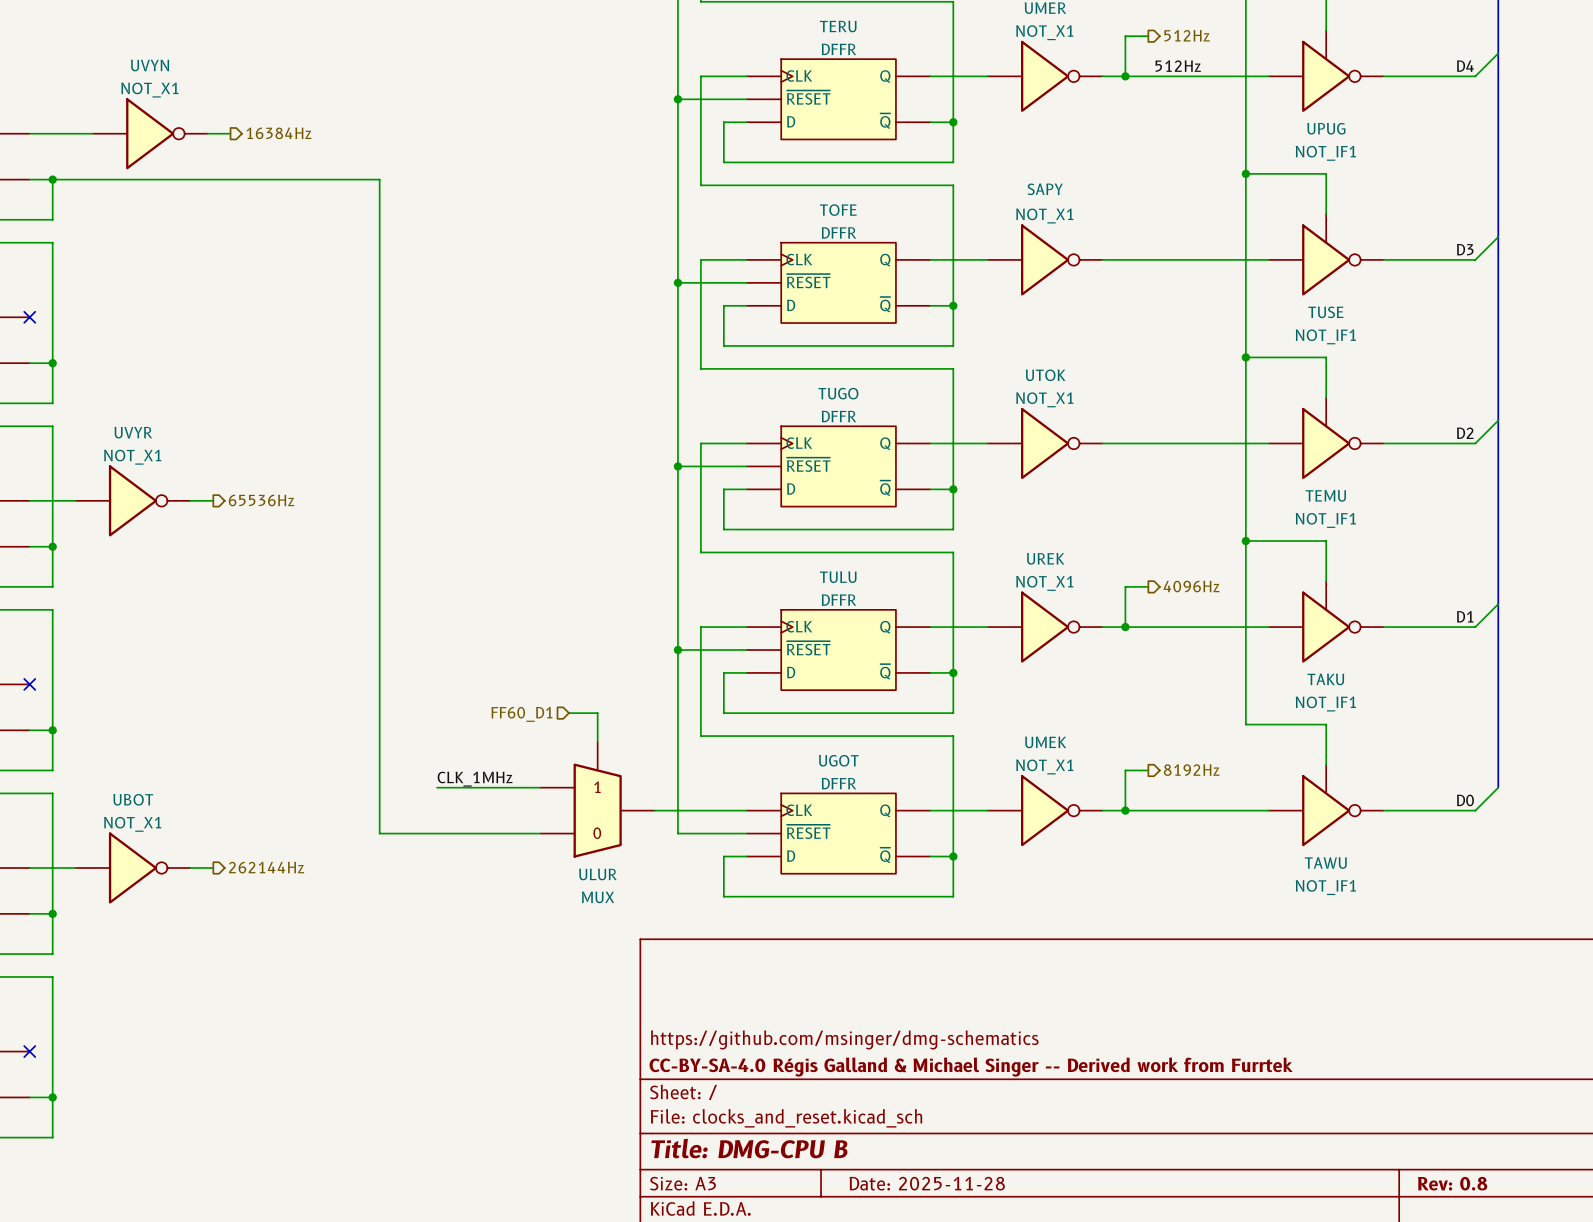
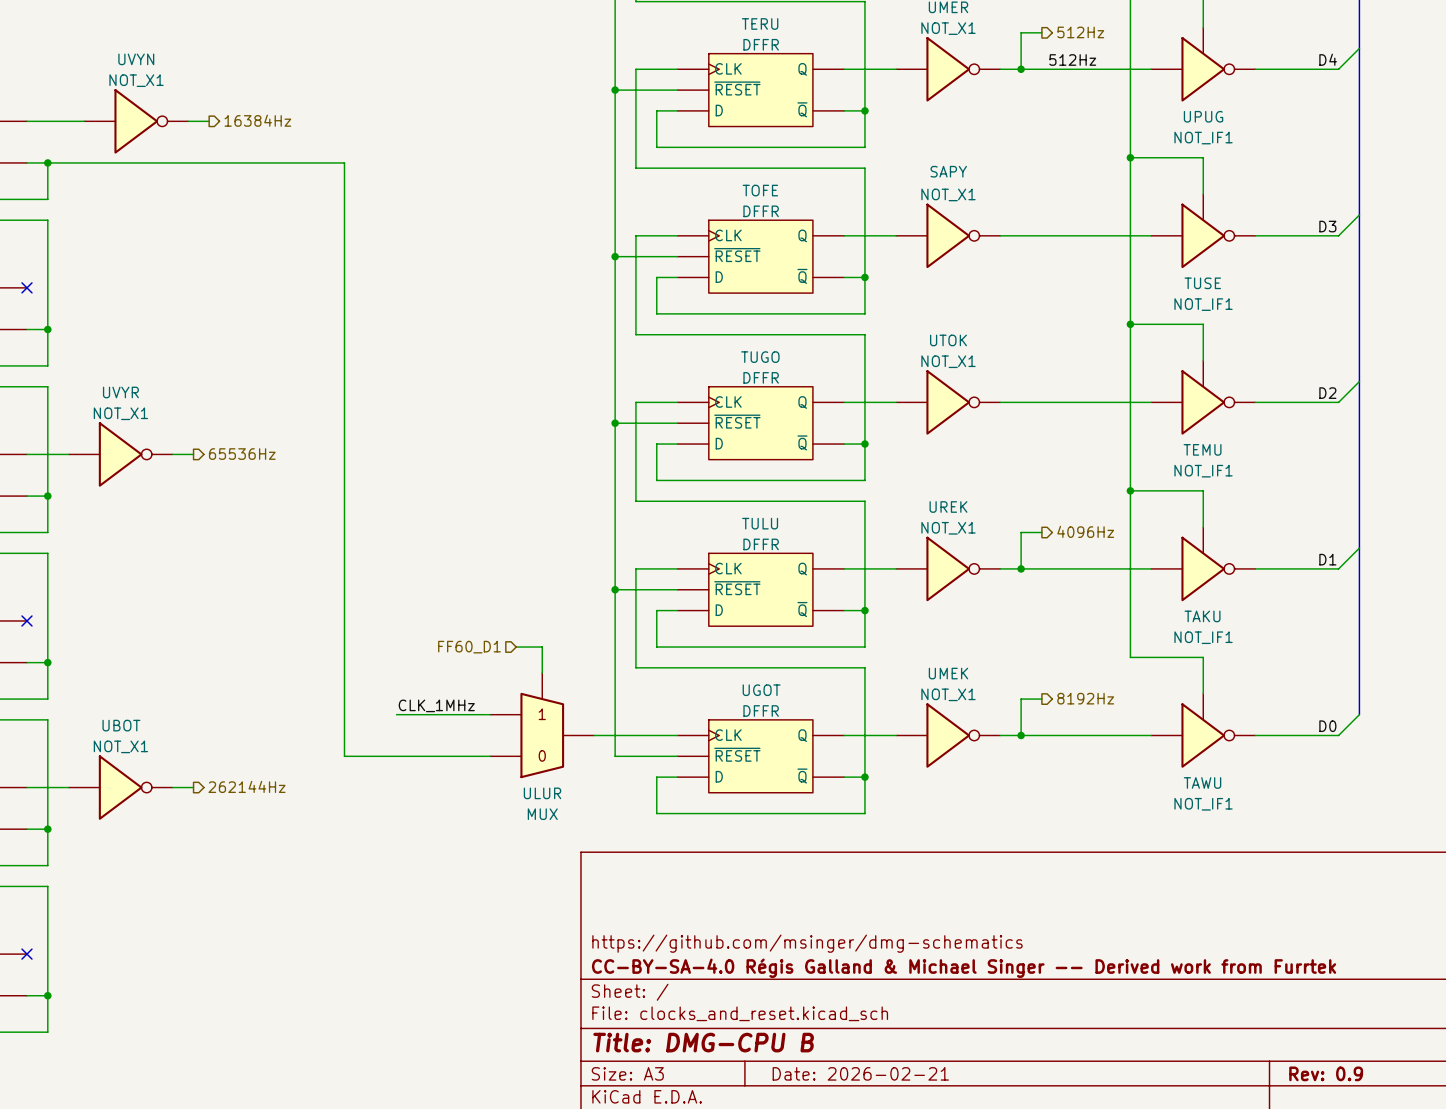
title block: Date: 2025-11-28 (927, 1183) -> Date: 2026-02-21 (860, 1073)
title block: Rev: 0.8 (1452, 1183) -> Rev: 0.9 (1326, 1073)

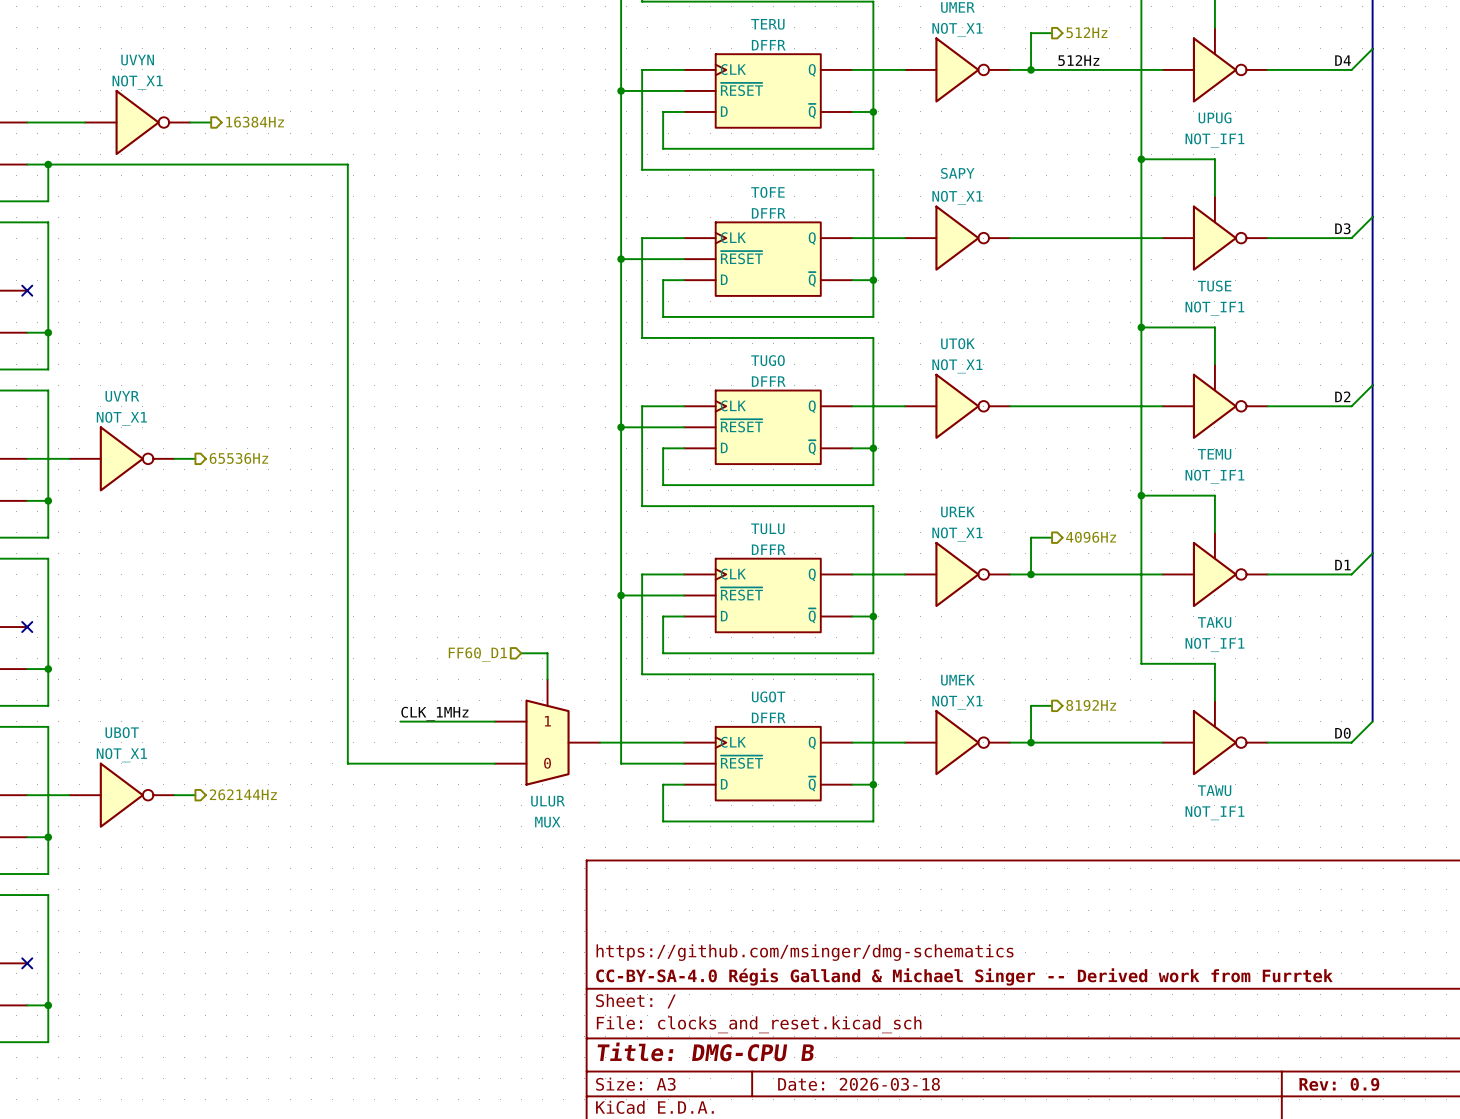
title block: Date: 2026-02-21 (860, 1073) -> Date: 2026-03-18 (859, 1084)

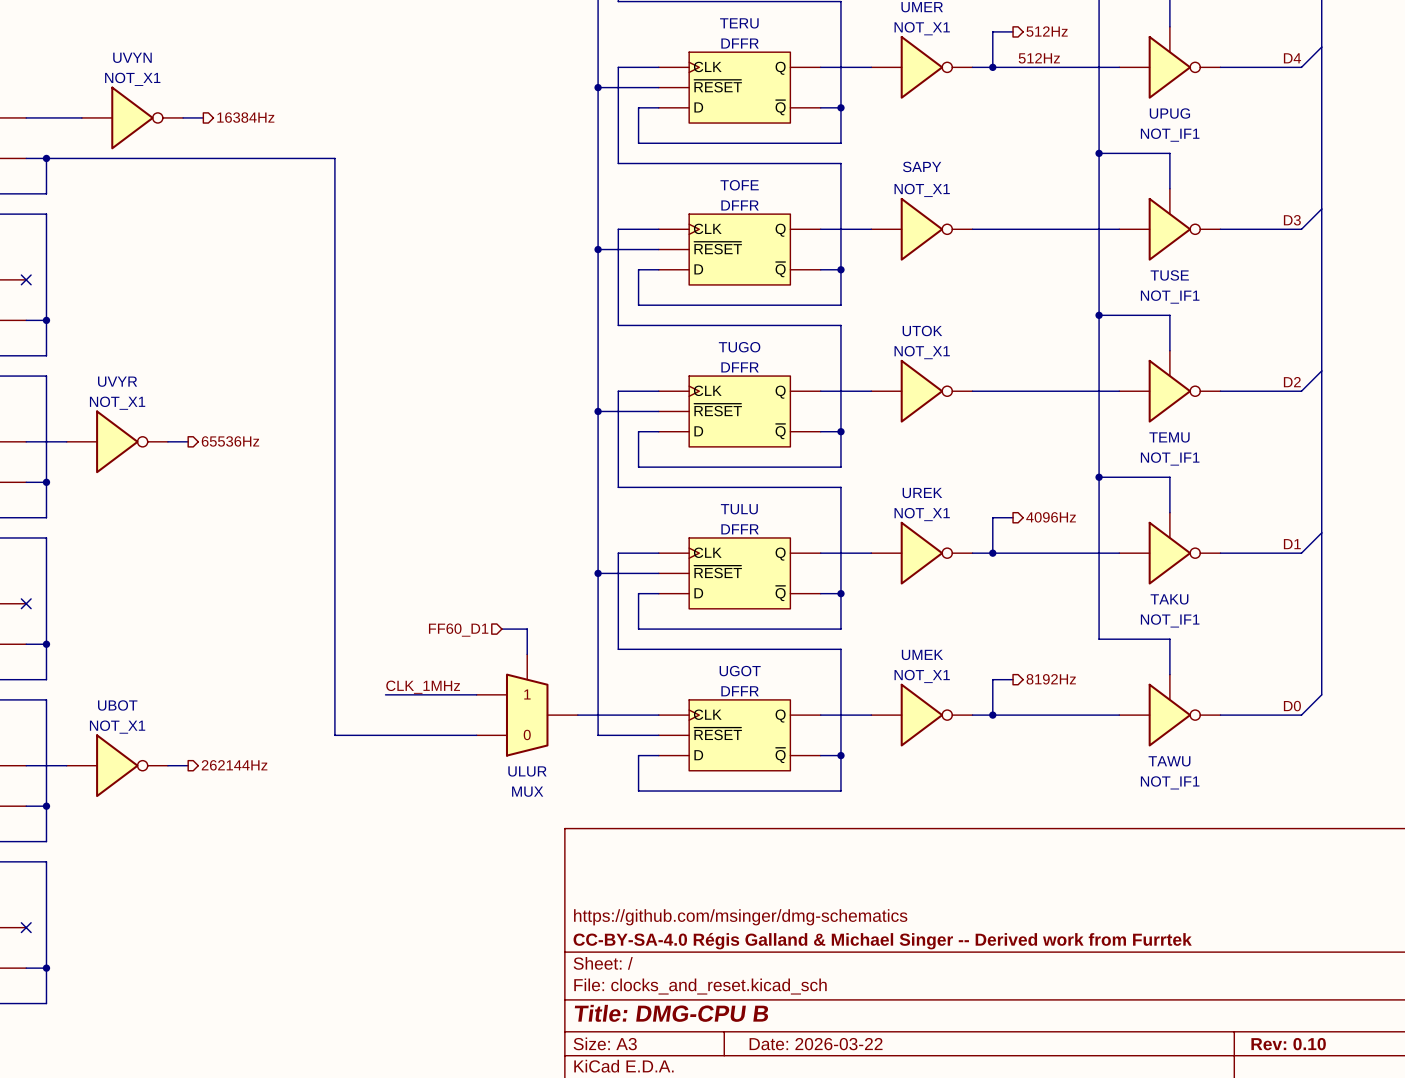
title block: Date: 2026-03-18 (859, 1084) -> Date: 2026-03-22 (816, 1044)
title block: Rev: 0.9 (1339, 1084) -> Rev: 0.10 (1288, 1044)

